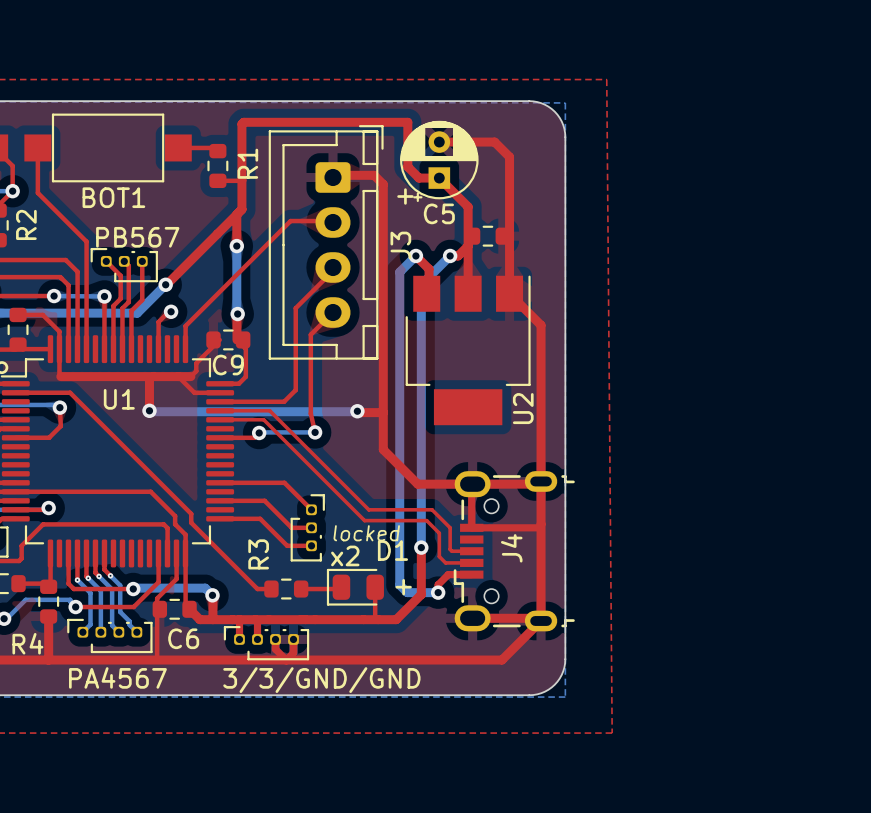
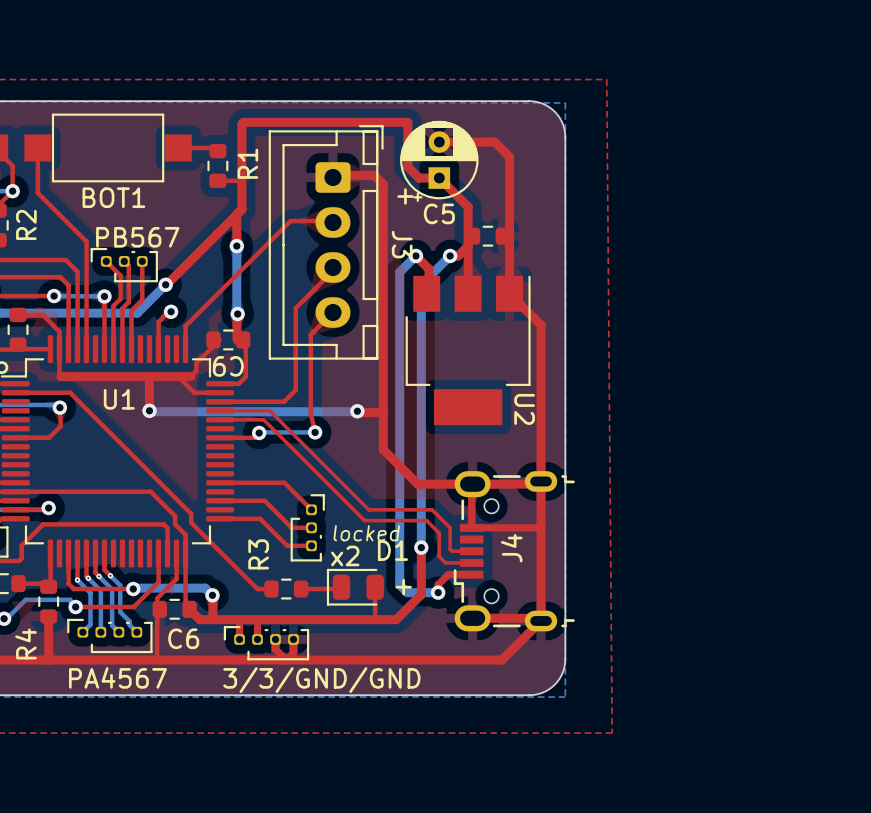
J3 name rotation: 0° (400, 245) -> 180° (402, 244)
C9 name rotation: 0° (228, 365) -> 180° (228, 366)
U2 name rotation: 0° (523, 408) -> 180° (524, 409)
R4 name rotation: 0° (27, 643) -> 90° counterclockwise (25, 643)

